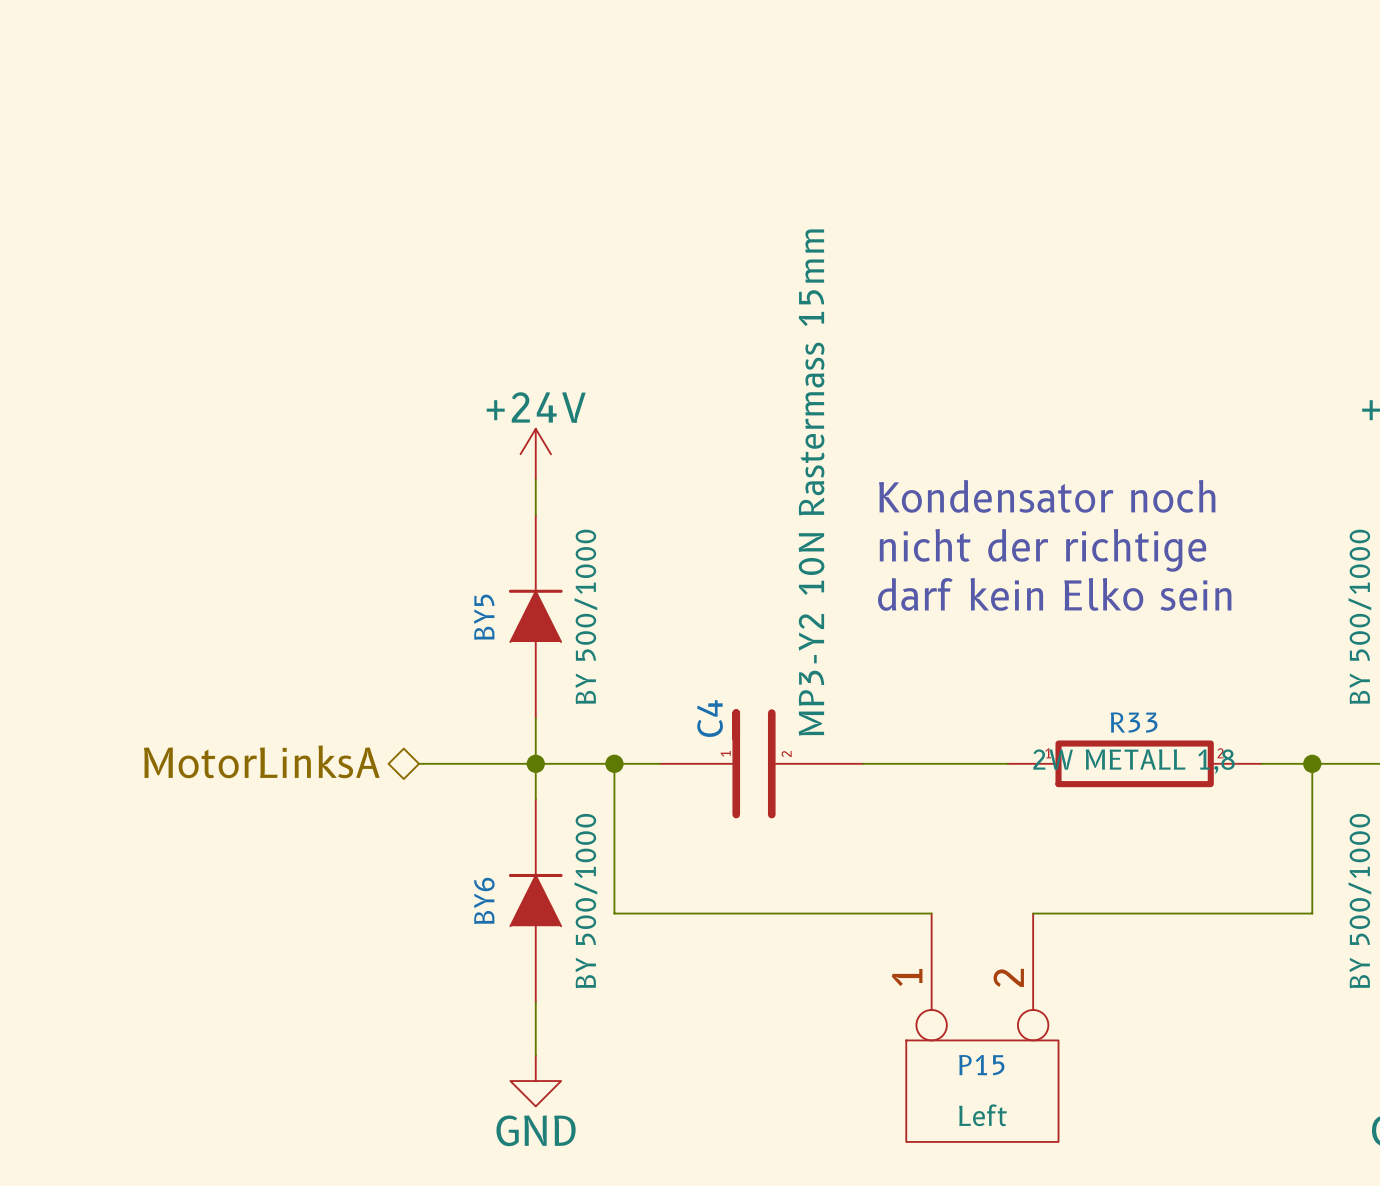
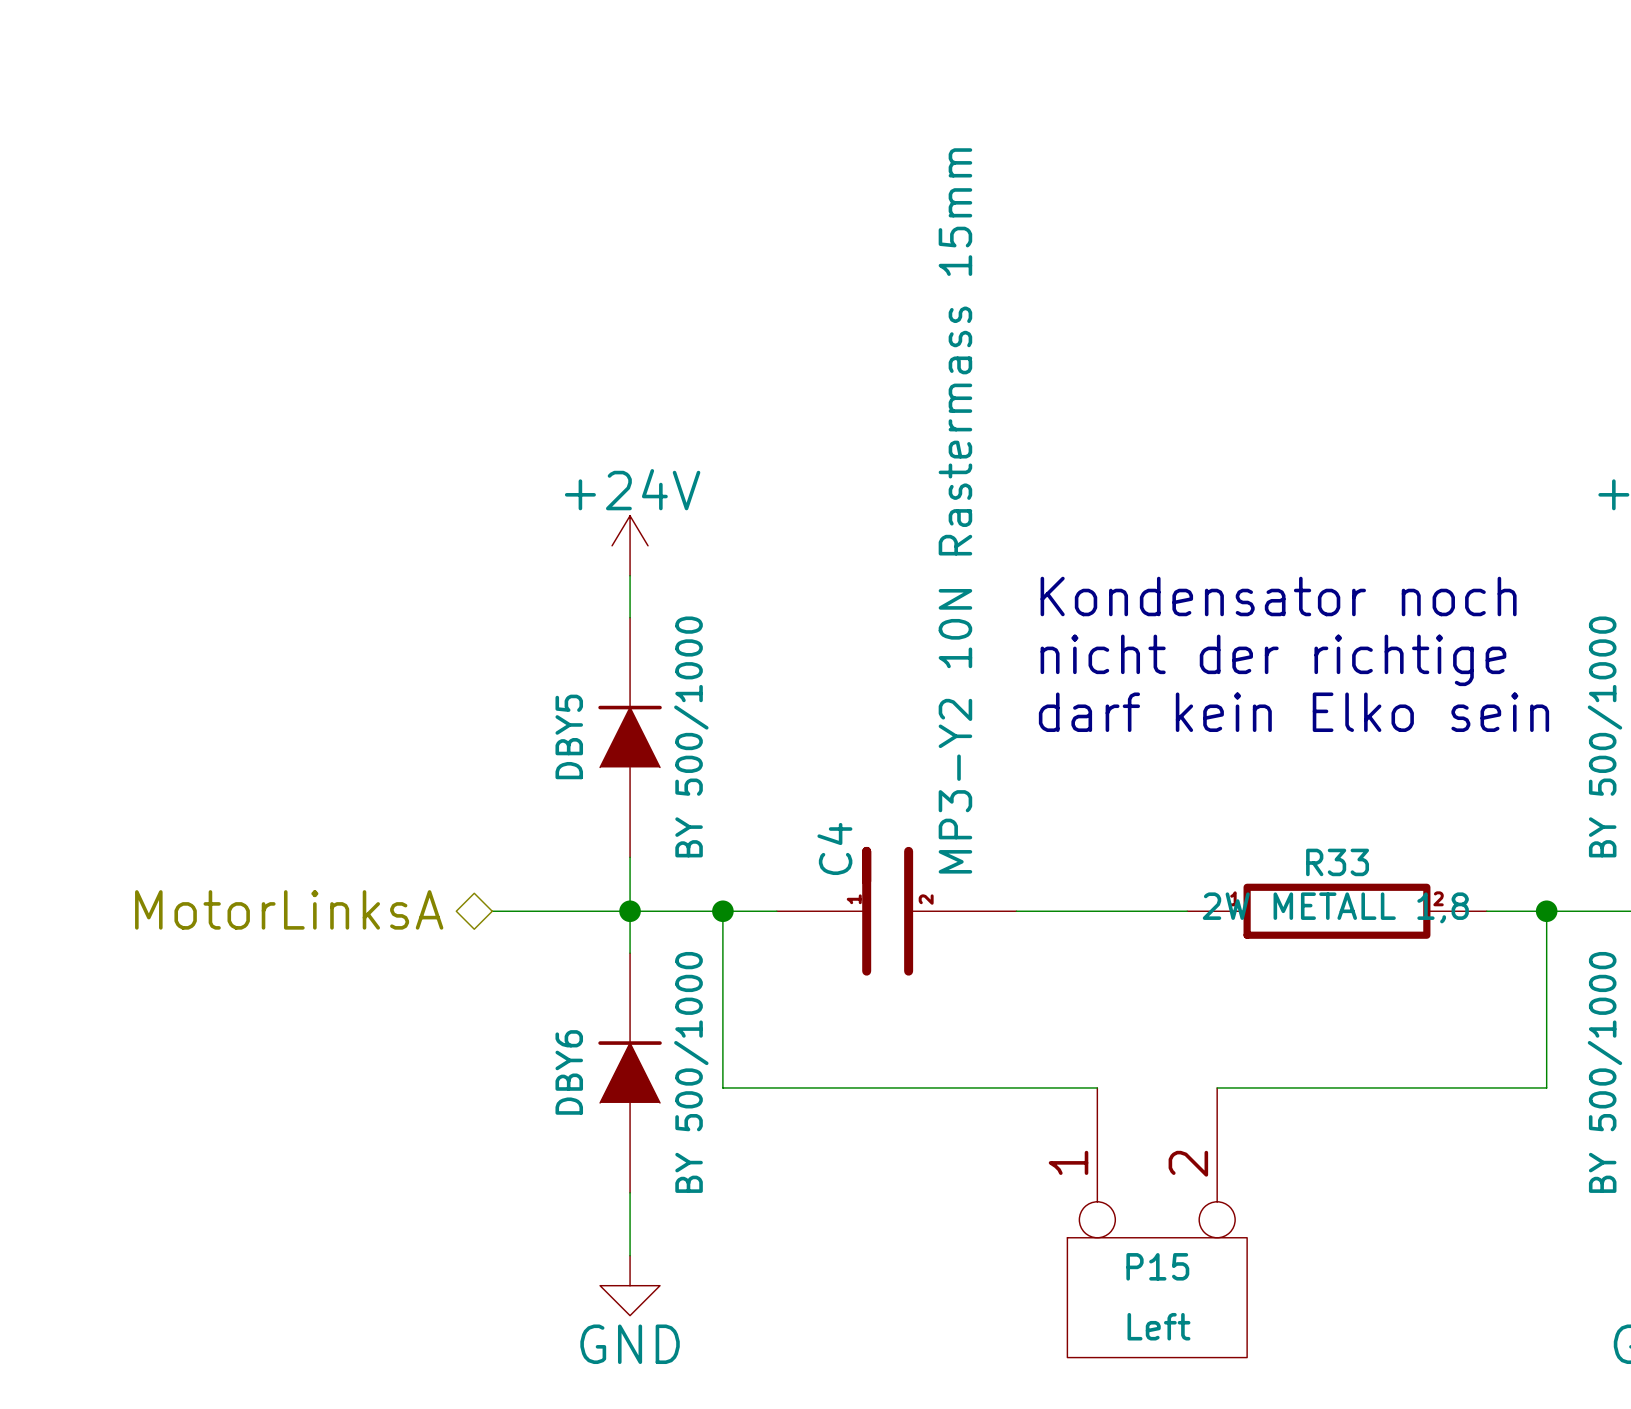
BY5 name: BY5 (484, 617) -> DBY5 (569, 736)
BY6 name: BY6 (484, 900) -> DBY6 (569, 1072)

